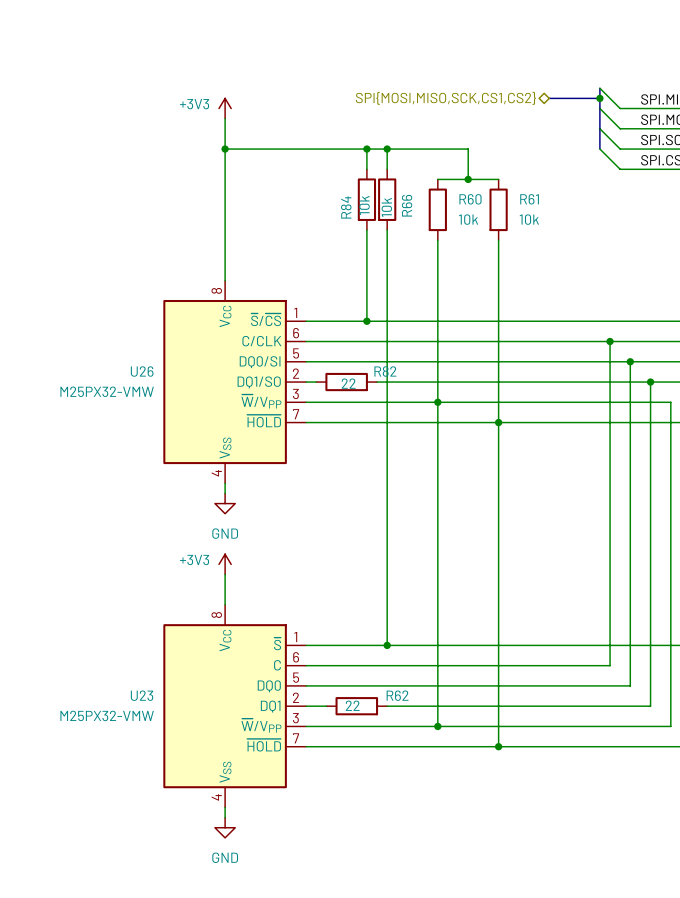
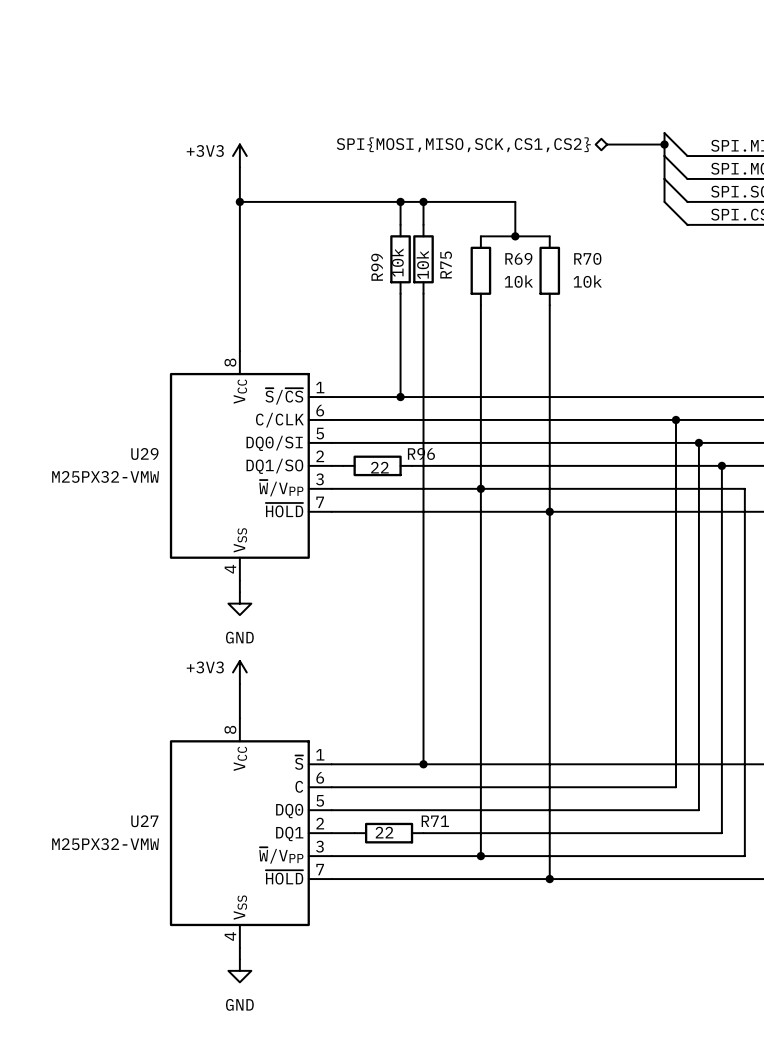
R60 name: R60 (470, 199) -> R69 (518, 258)
R61 name: R61 (529, 199) -> R70 (587, 258)
R66 name: R66 (407, 205) -> R75 (446, 264)
R84 name: R84 (346, 207) -> R99 (377, 267)
U26 name: U26 (142, 371) -> U29 (144, 453)
R82 name: R82 (385, 371) -> R96 (421, 453)
U23 name: U23 (142, 695) -> U27 (144, 821)
R62 name: R62 (397, 695) -> R71 (435, 821)

